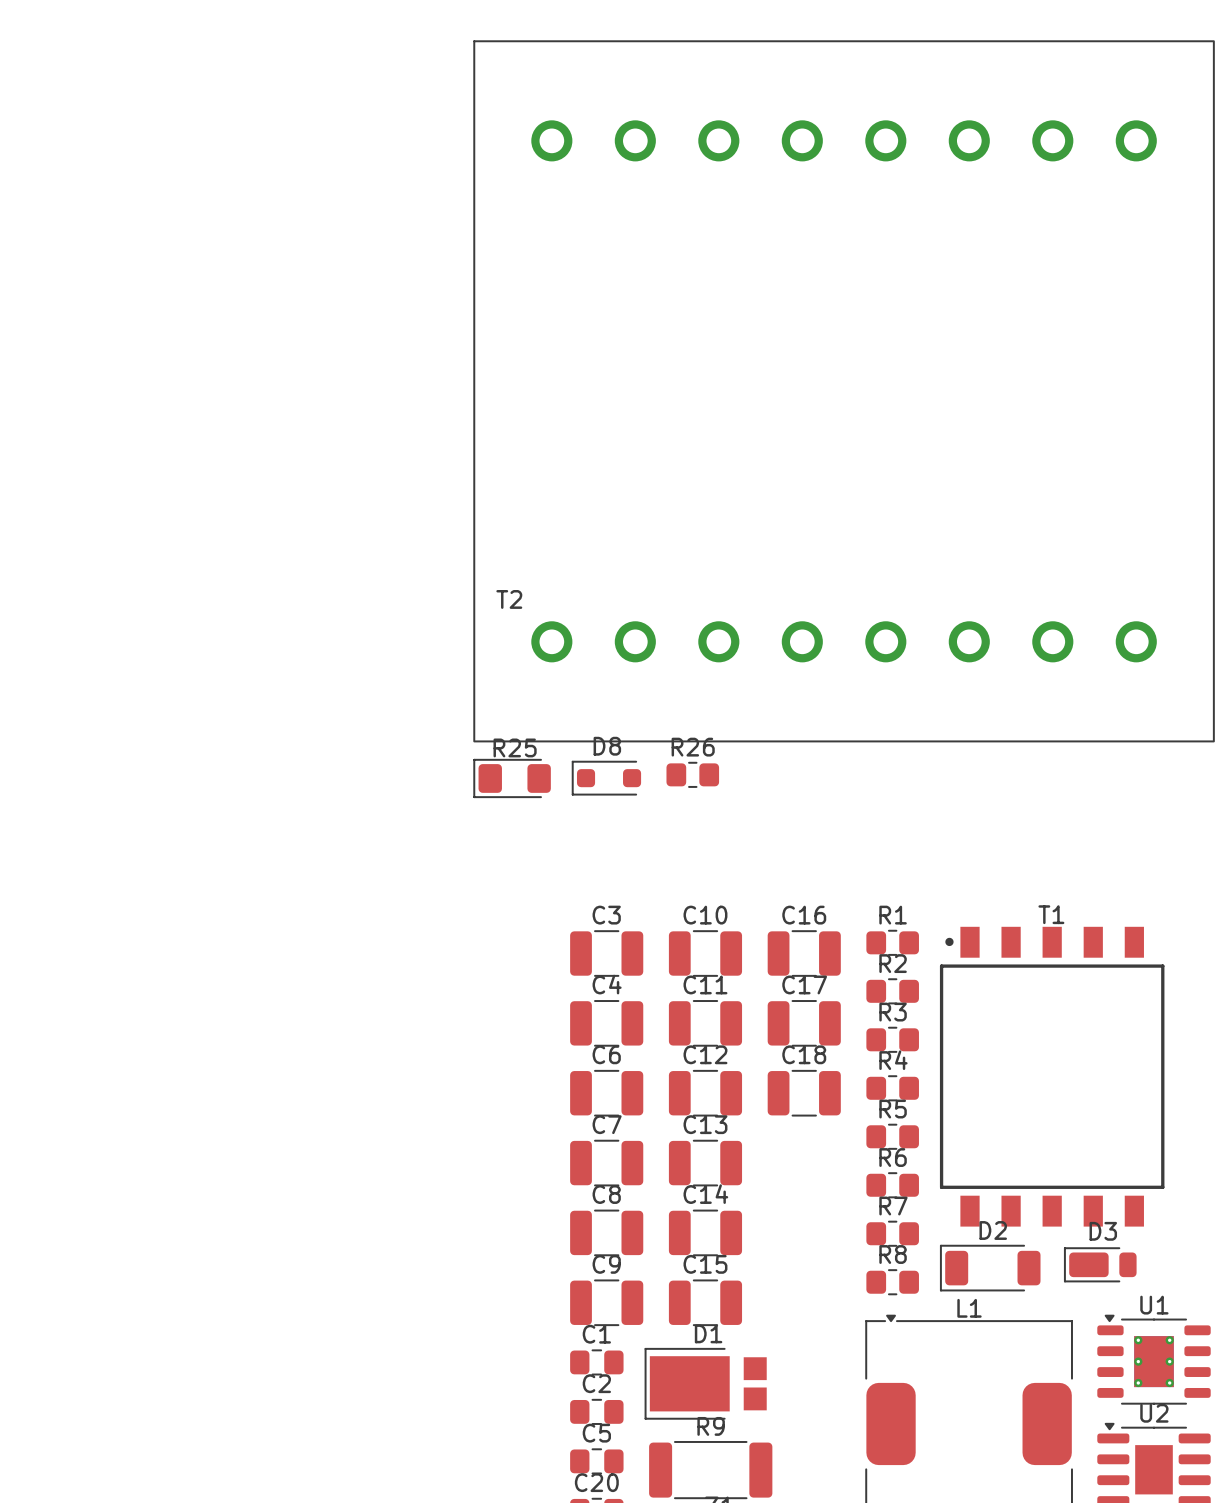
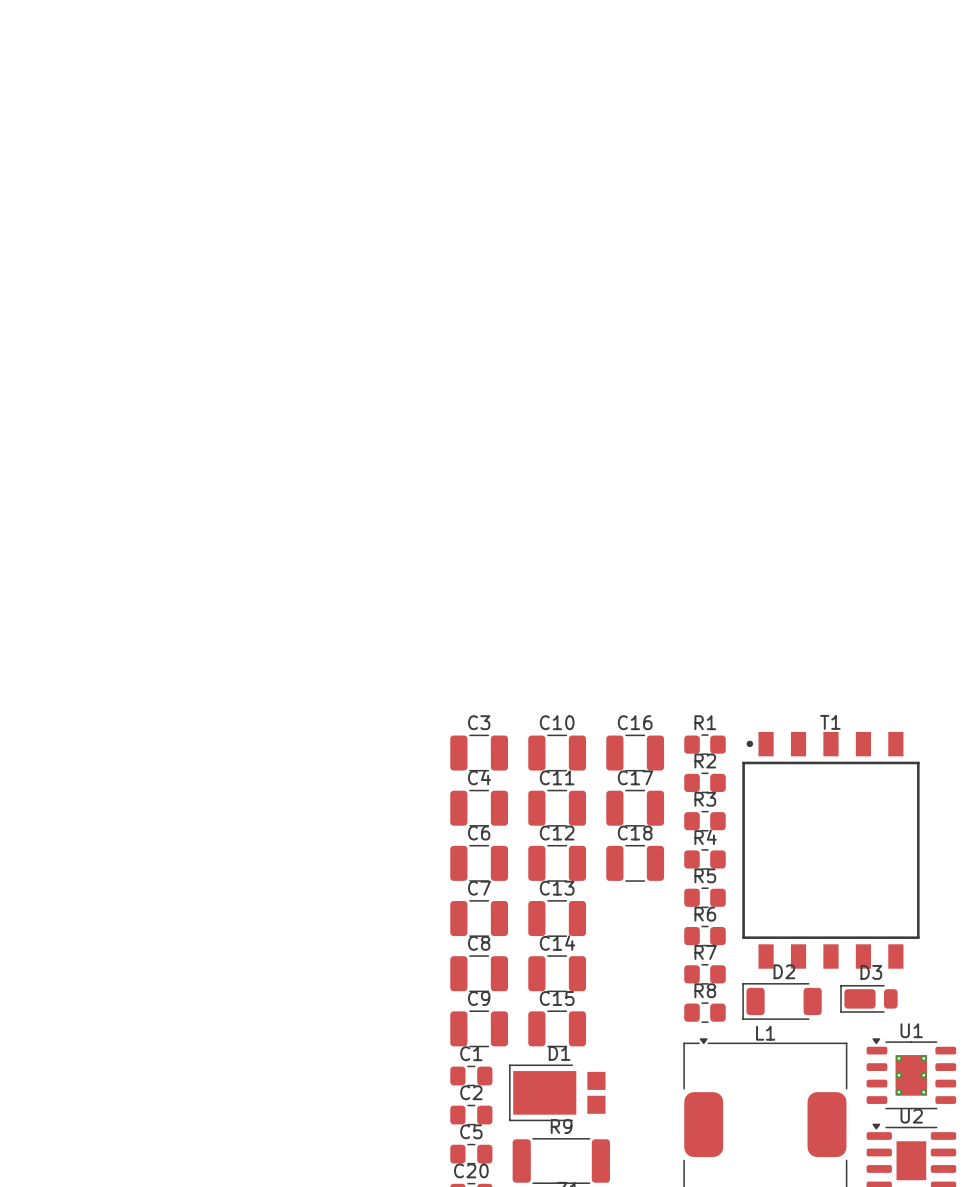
T2: (844, 391) -> none
R26: (692, 774) -> none
R25: (512, 778) -> none
D8: (606, 778) -> none

